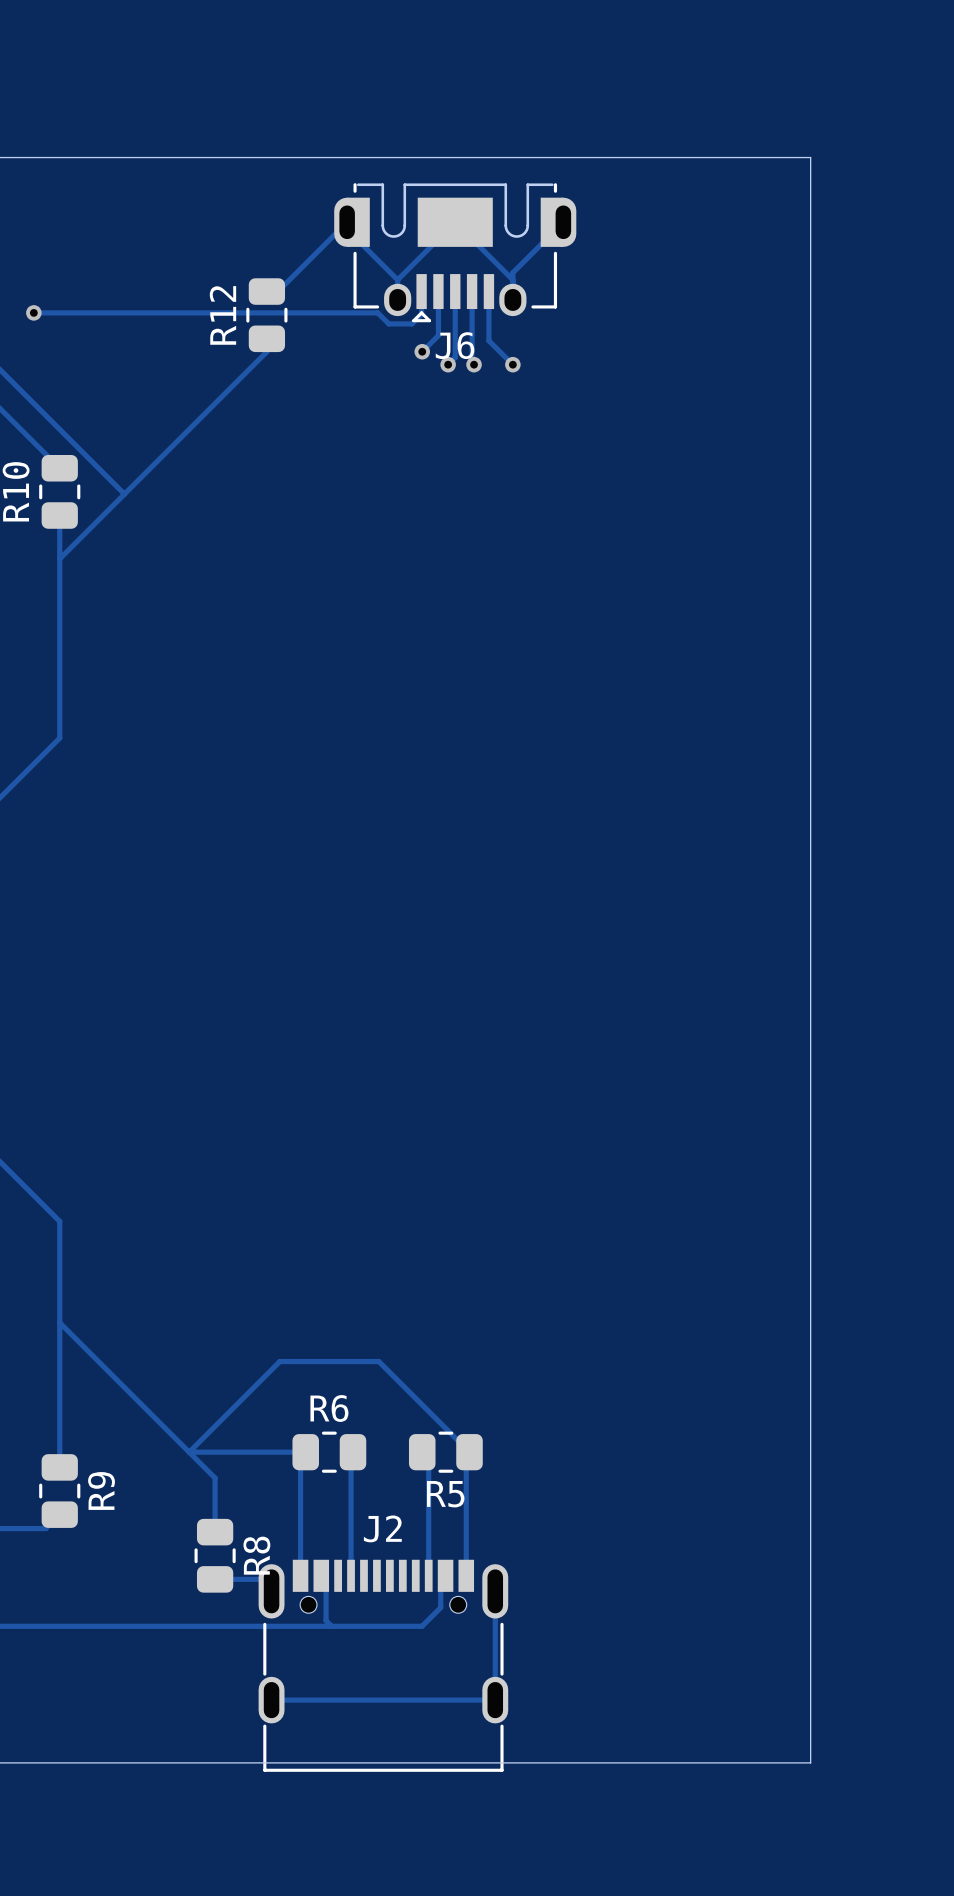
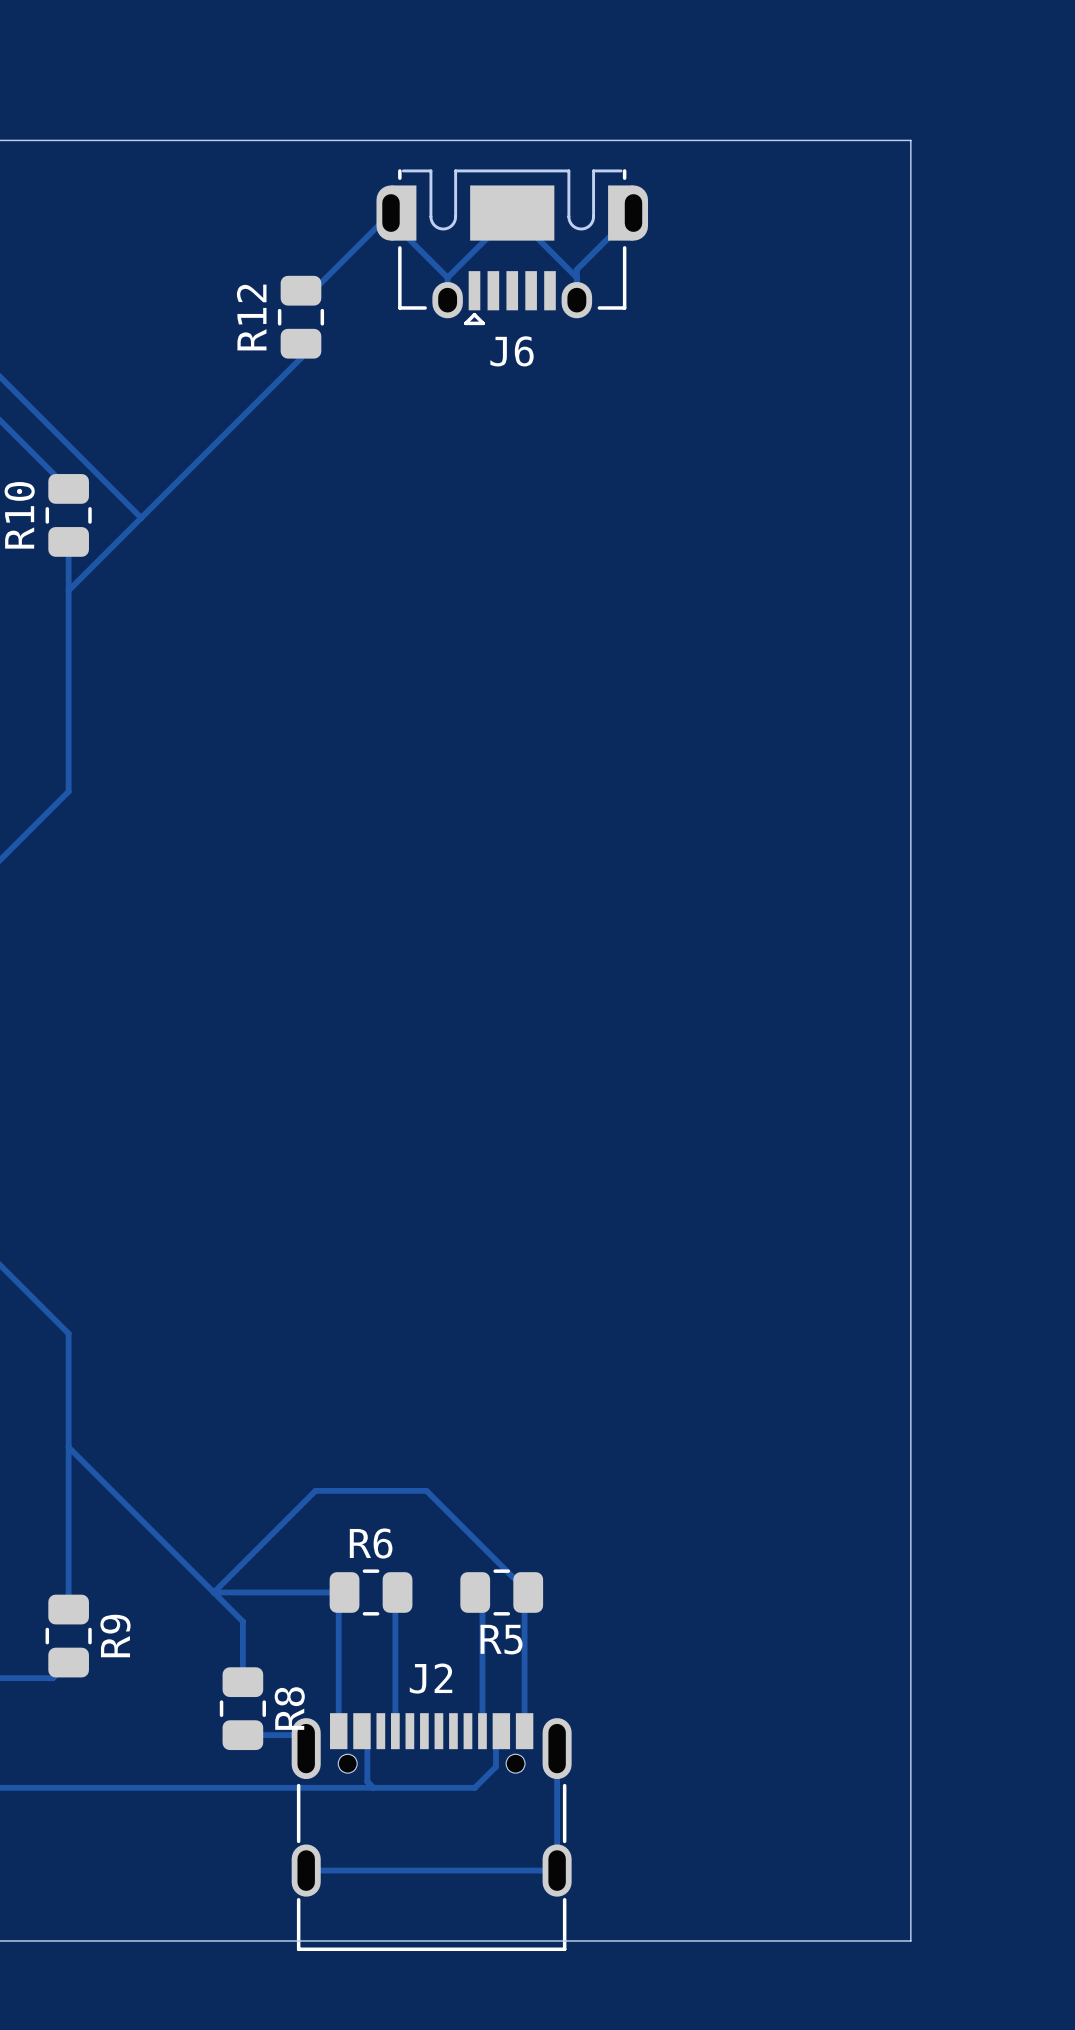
track: (421, 291) (421, 314) (411, 323) (388, 323) (377, 312) (33, 312) -> none
track: (438, 291) (438, 335) (422, 351) -> none
track: (455, 291) (455, 357) (448, 364) -> none
track: (472, 291) (472, 362) (474, 364) -> none
track: (488, 291) (488, 340) (512, 364) -> none
via: (33, 312) -> none
via: (422, 351) -> none
via: (448, 364) -> none
via: (474, 364) -> none
via: (512, 364) -> none

